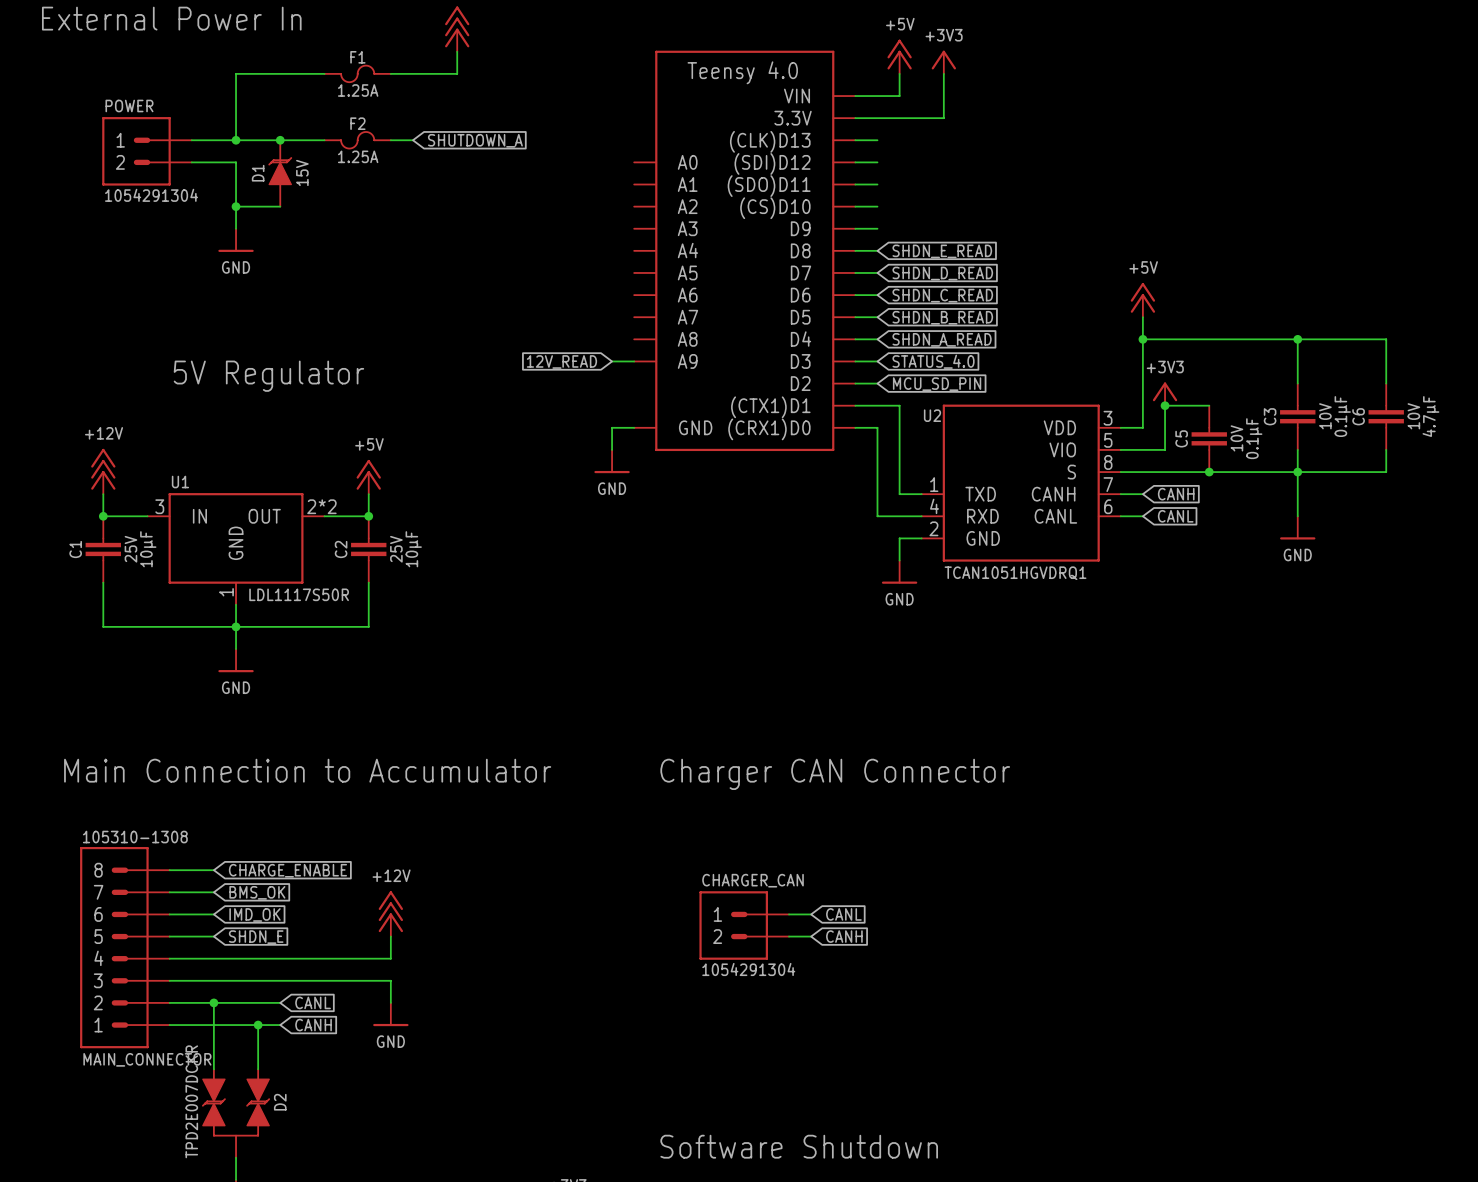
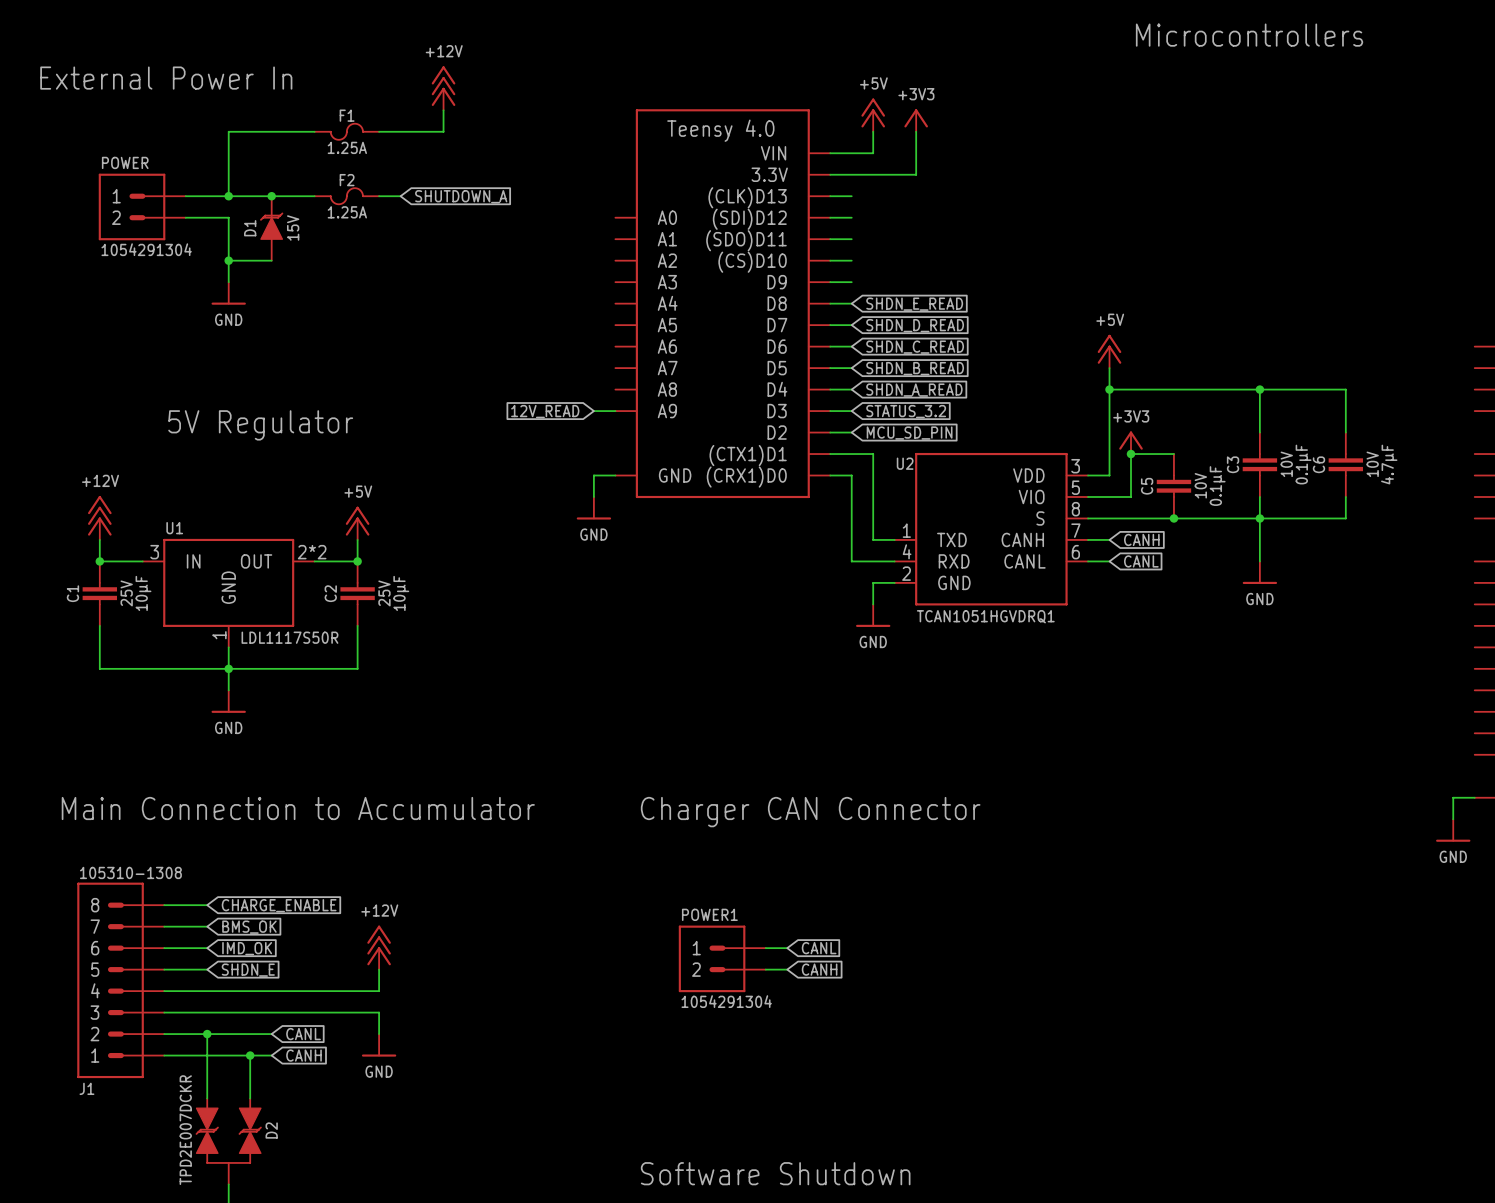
global label: STATUS_4.0 (933, 361) -> STATUS_3.2 (906, 411)
CHARGER_CAN name: CHARGER_CAN (753, 880) -> POWER1 (709, 914)
MAIN_CONNECTOR name: MAIN_CONNECTOR (147, 1059) -> J1 (86, 1088)

